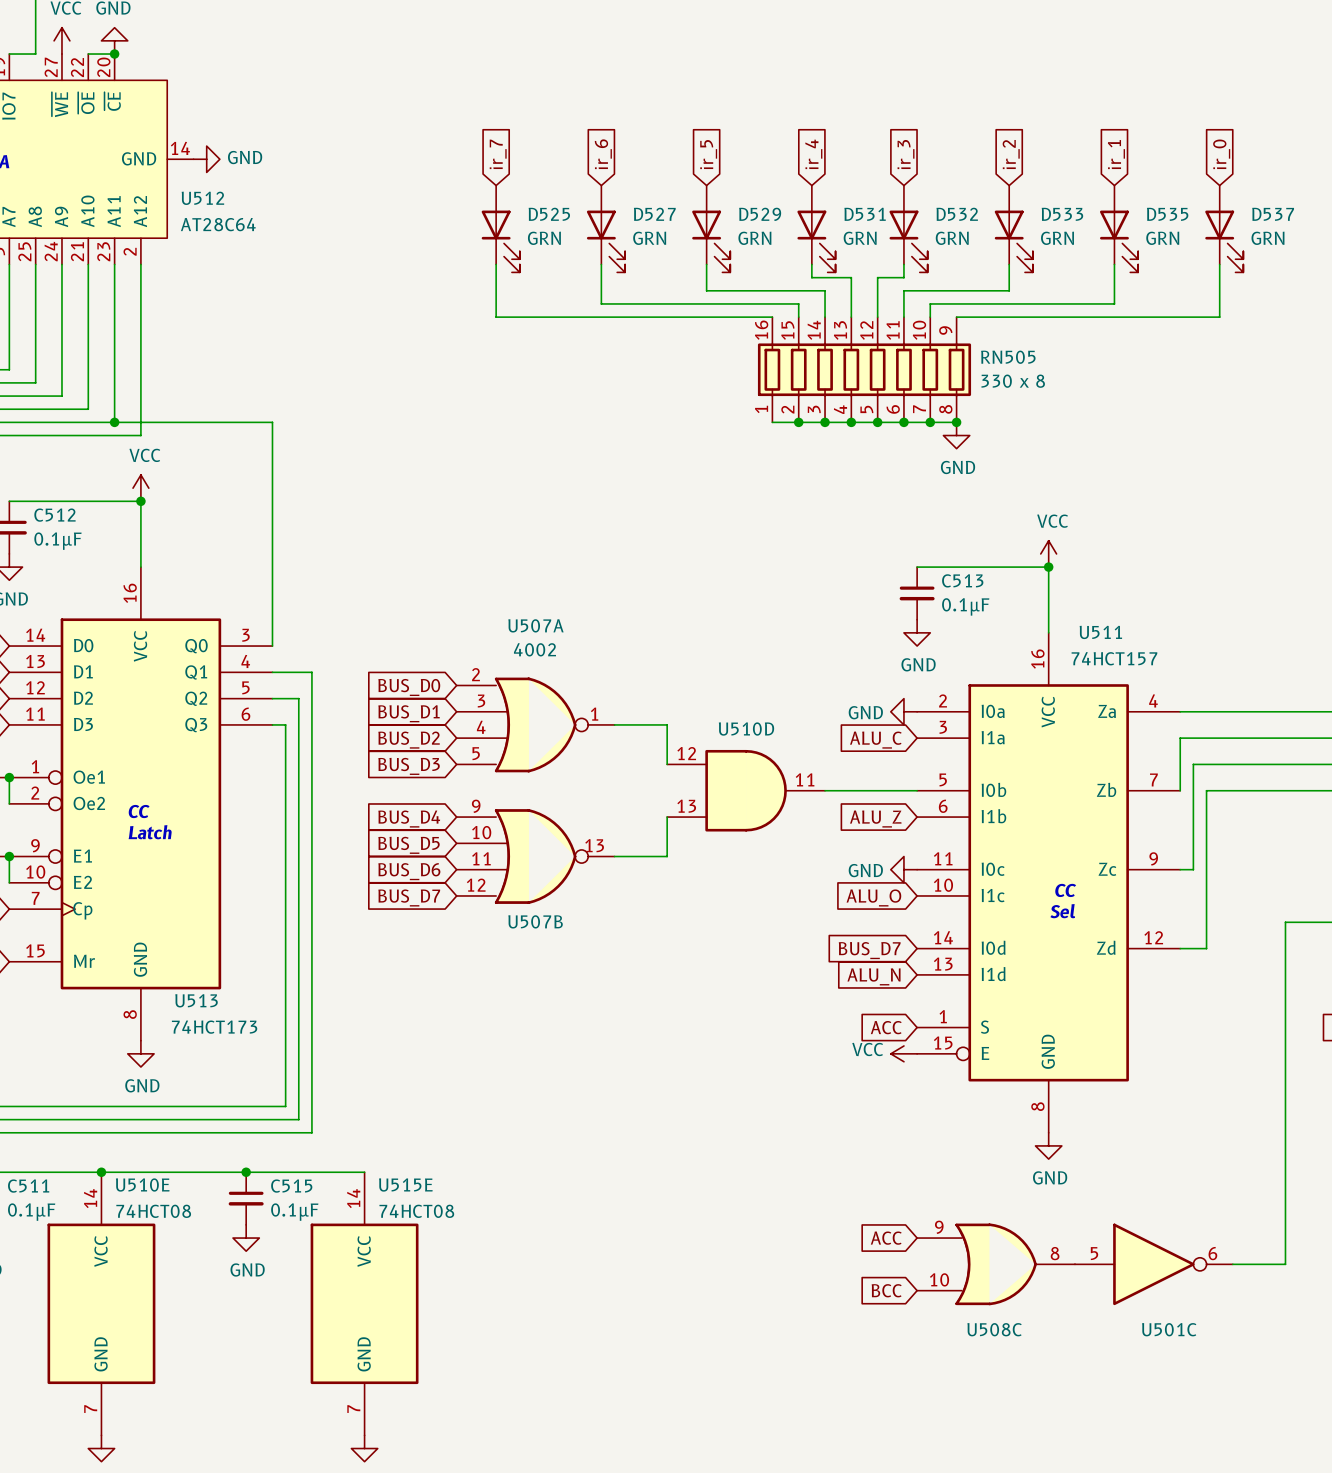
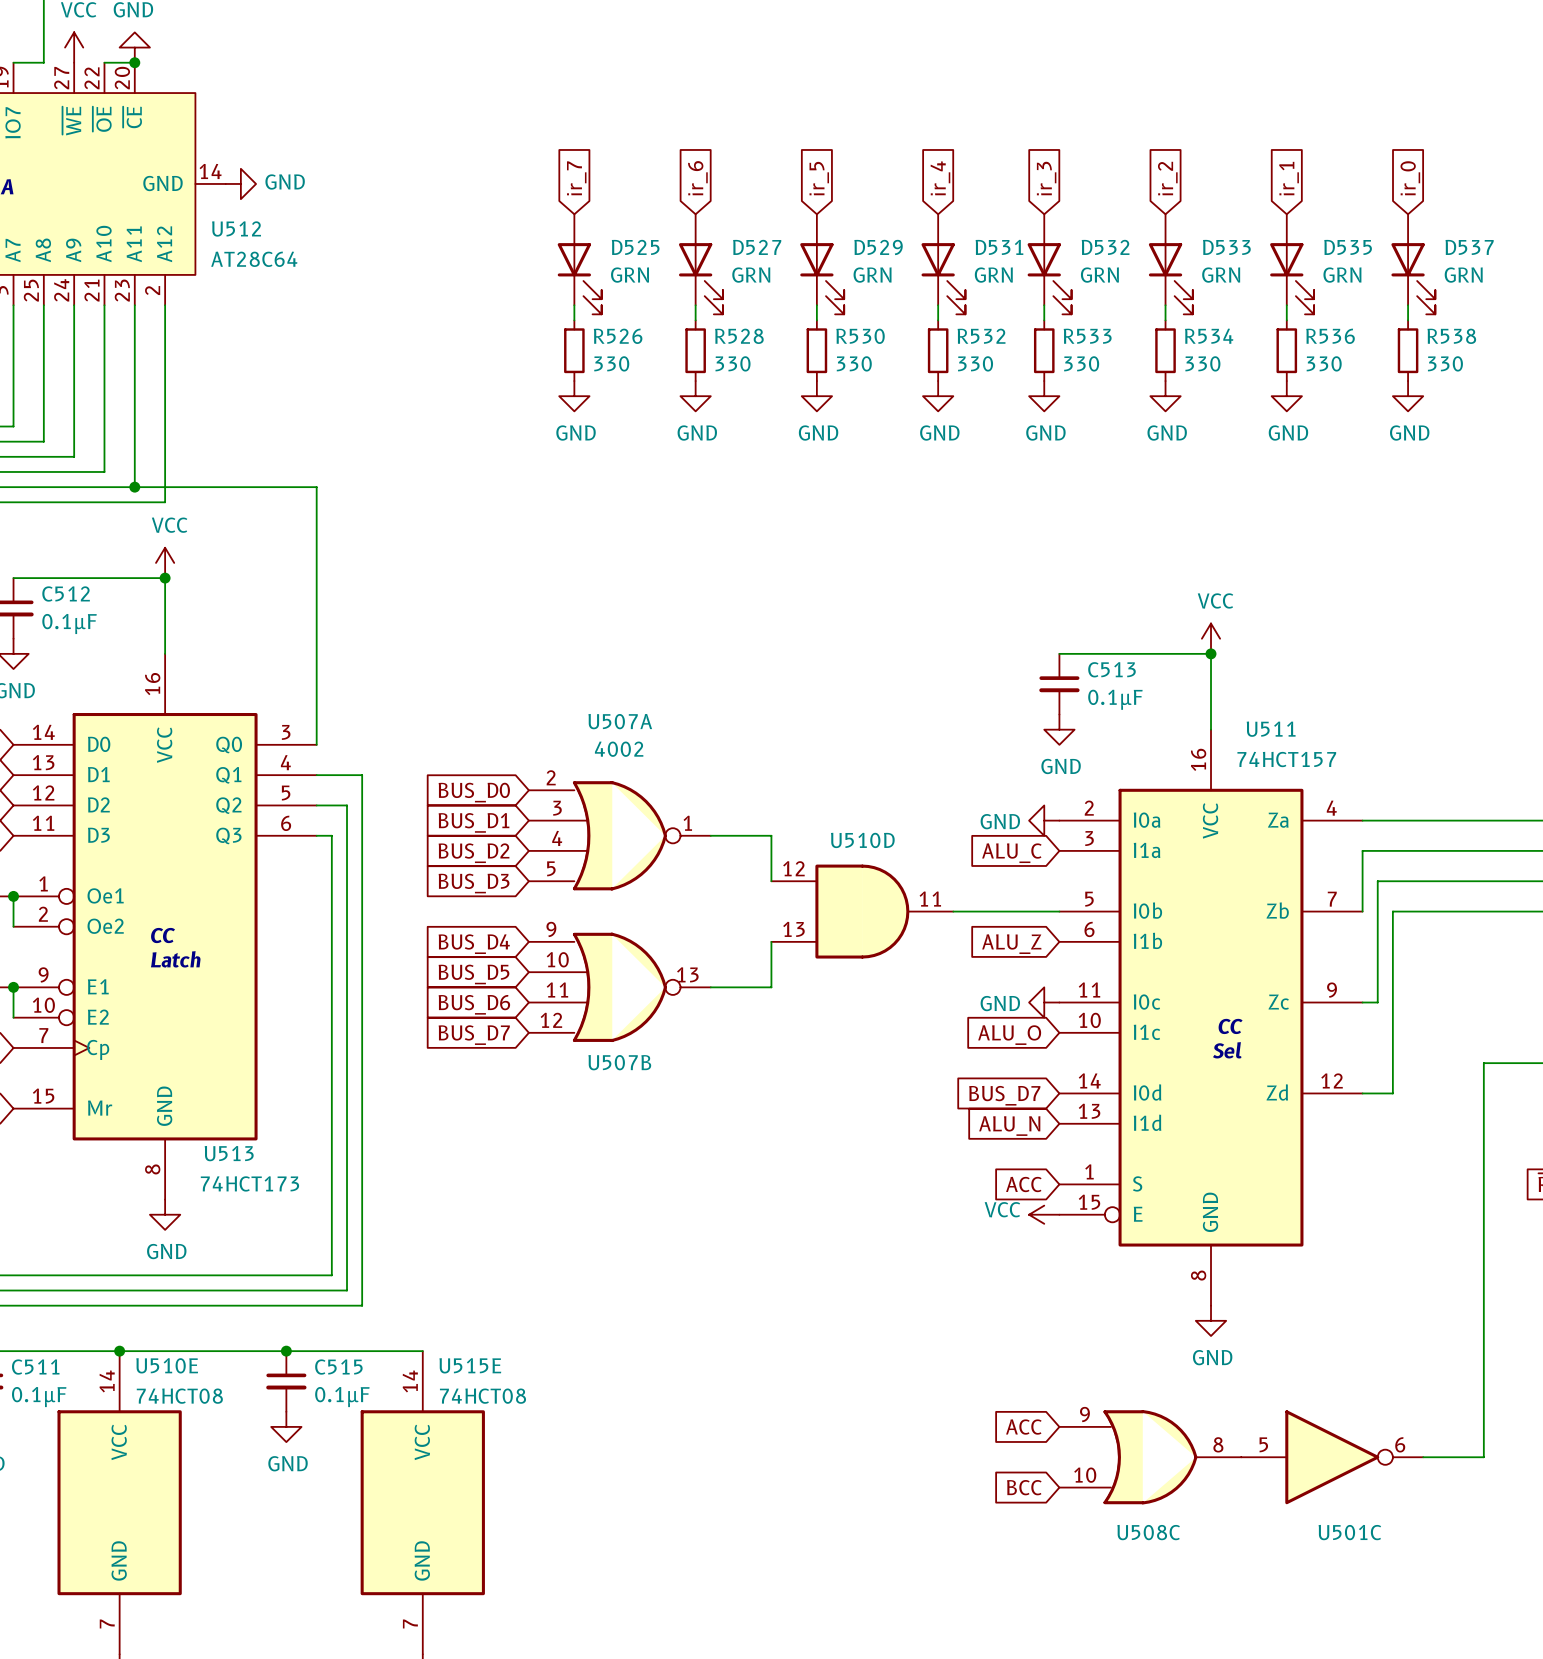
wire: (496, 277) (496, 317) (772, 317) -> none
wire: (601, 277) (601, 303) (798, 303) (798, 317) -> none
wire: (706, 277) (706, 290) (825, 290) (825, 317) -> none
wire: (811, 277) (851, 277) (851, 317) -> none
wire: (903, 277) (877, 277) (877, 317) -> none
wire: (1009, 277) (1009, 290) (903, 290) (903, 317) -> none
wire: (1114, 277) (1114, 303) (930, 303) (930, 317) -> none
wire: (1219, 277) (1219, 317) (956, 317) -> none
R526: none -> 330 (574, 350)
R528: none -> 330 (695, 350)
R530: none -> 330 (816, 350)
R532: none -> 330 (938, 350)
R533: none -> 330 (1044, 350)
R534: none -> 330 (1165, 350)
R536: none -> 330 (1286, 350)
R538: none -> 330 (1408, 350)
power symbol: none -> GND (574, 396)
power symbol: none -> GND (695, 396)
power symbol: none -> GND (816, 396)
power symbol: none -> GND (938, 396)
power symbol: none -> GND (1044, 396)
power symbol: none -> GND (1165, 396)
power symbol: none -> GND (1286, 396)
power symbol: none -> GND (1408, 396)
RN505: 330 x 8 (864, 369) -> none
wire: (772, 422) (956, 422) -> none
junction: (798, 422) -> none
junction: (825, 422) -> none
junction: (851, 422) -> none
junction: (877, 422) -> none
junction: (903, 422) -> none
junction: (930, 422) -> none
junction: (956, 422) -> none
power symbol: GND (956, 435) -> none

